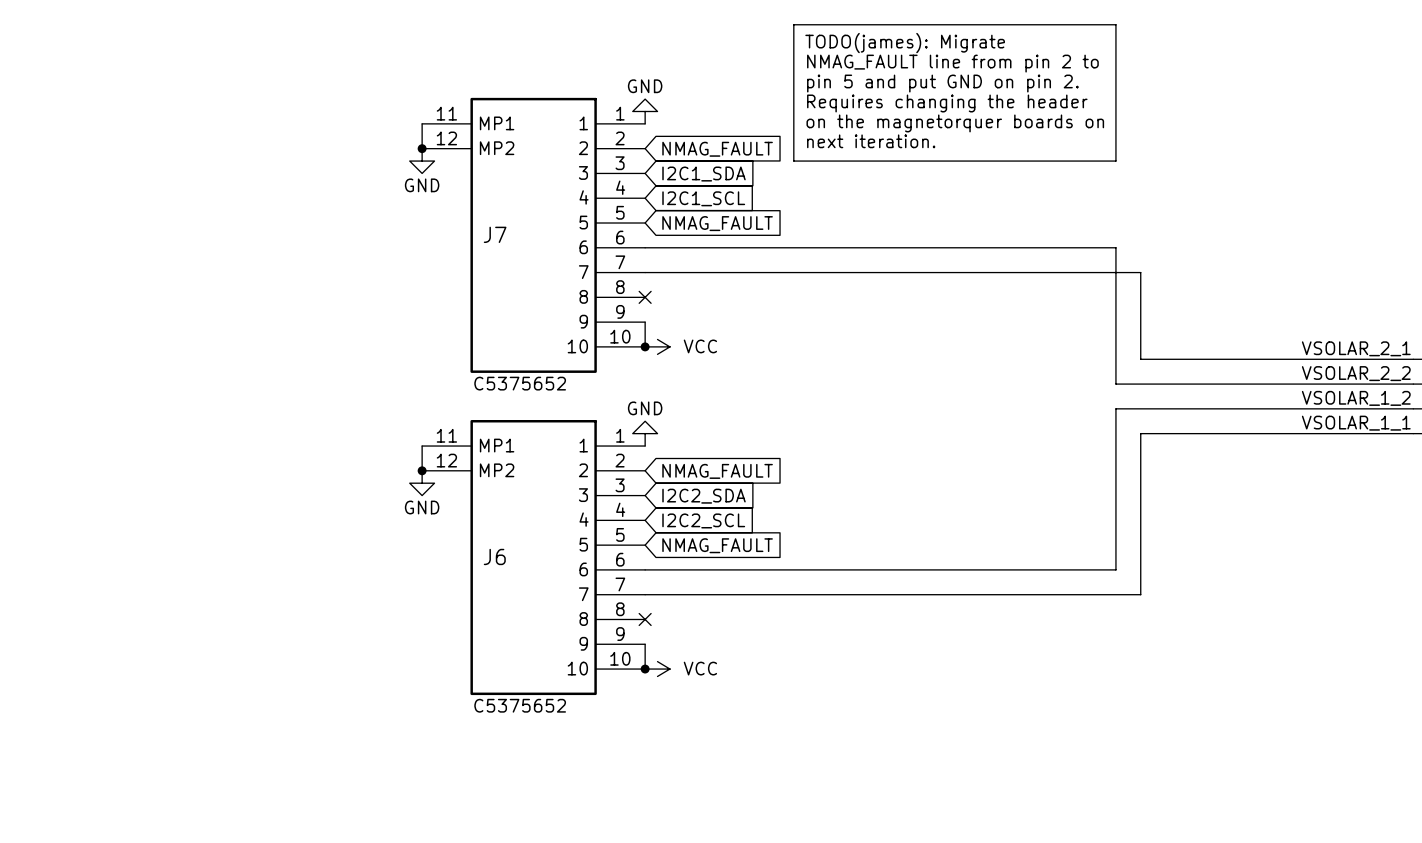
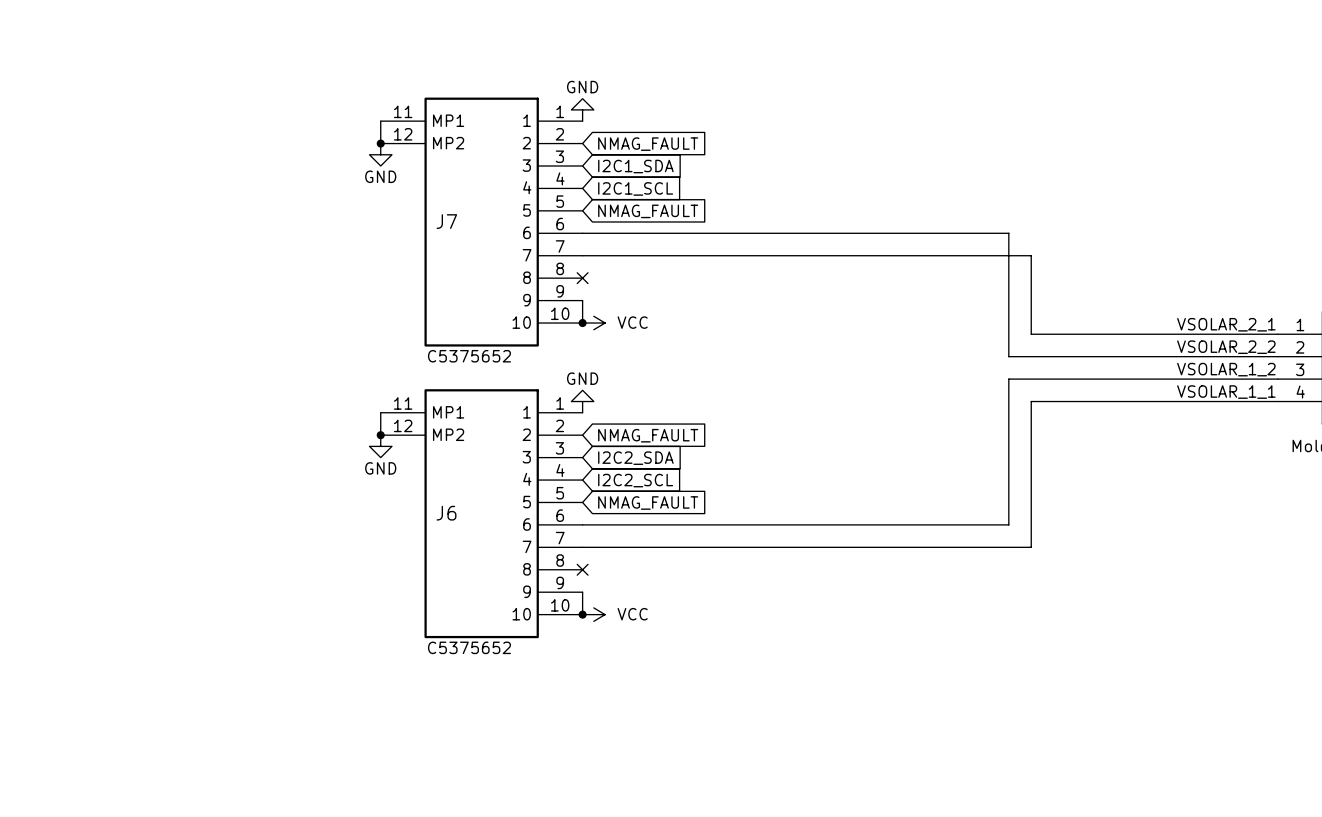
line: (793, 24) (1115, 24) (1115, 161) (793, 161) (793, 24) -> none
text: TODO(james): Migrate (905, 43) -> none
text: NMAG_FAULT line from pin 2 to (952, 63) -> none
text: pin 5 and put GND on pin 2. (942, 83) -> none
text: Requires changing the header (947, 103) -> none
text: on the magnetorquer boards on (955, 123) -> none
text: next iteration. (871, 141) -> none

